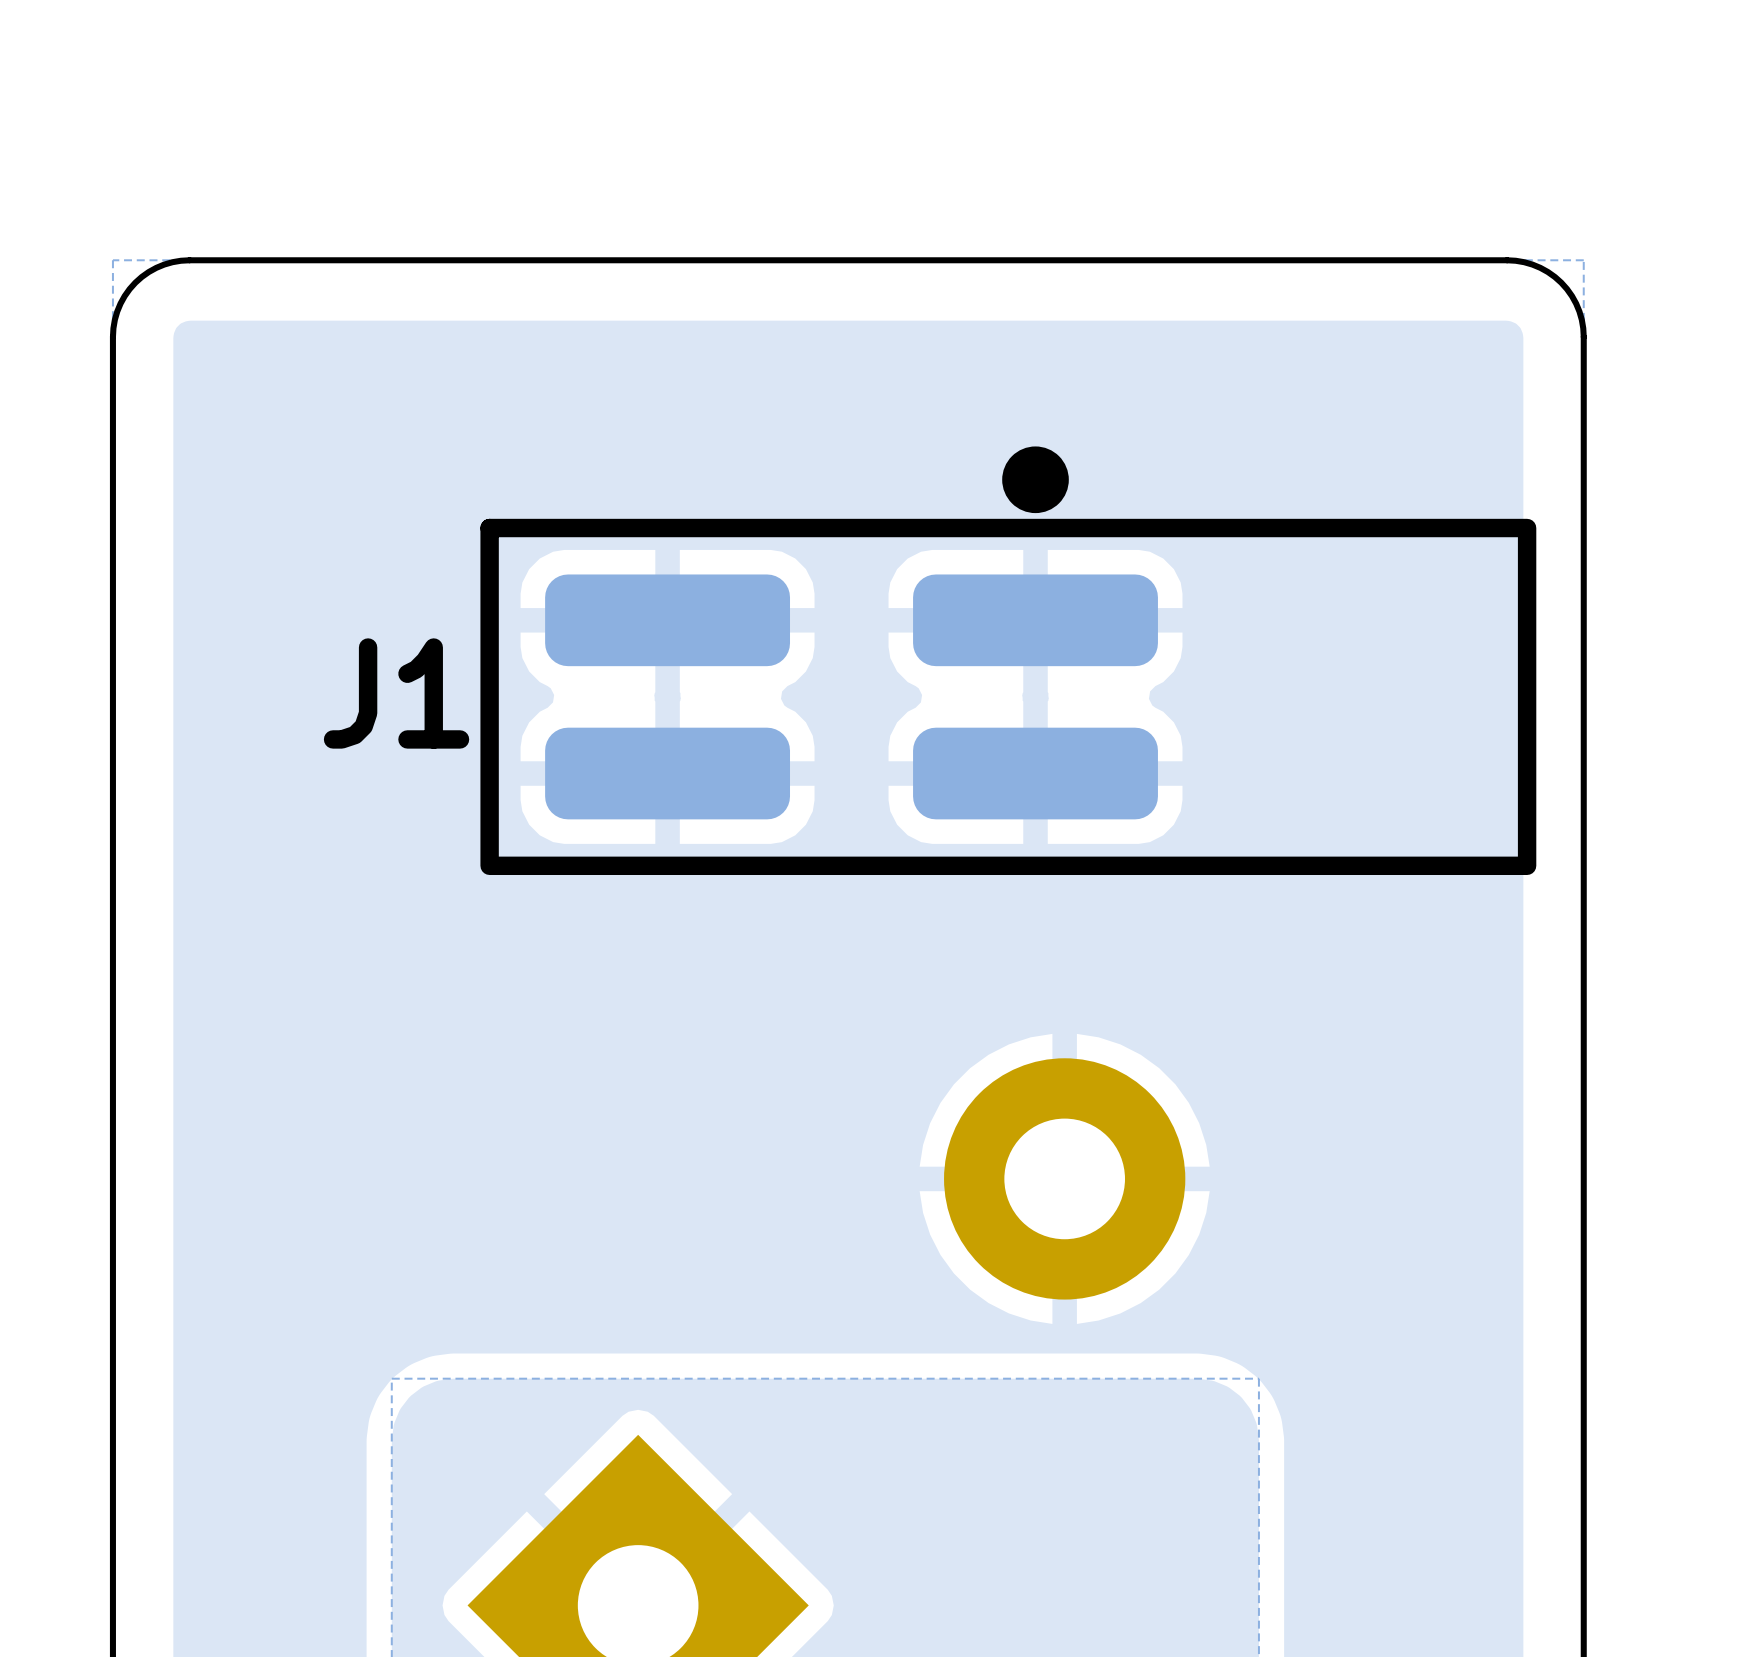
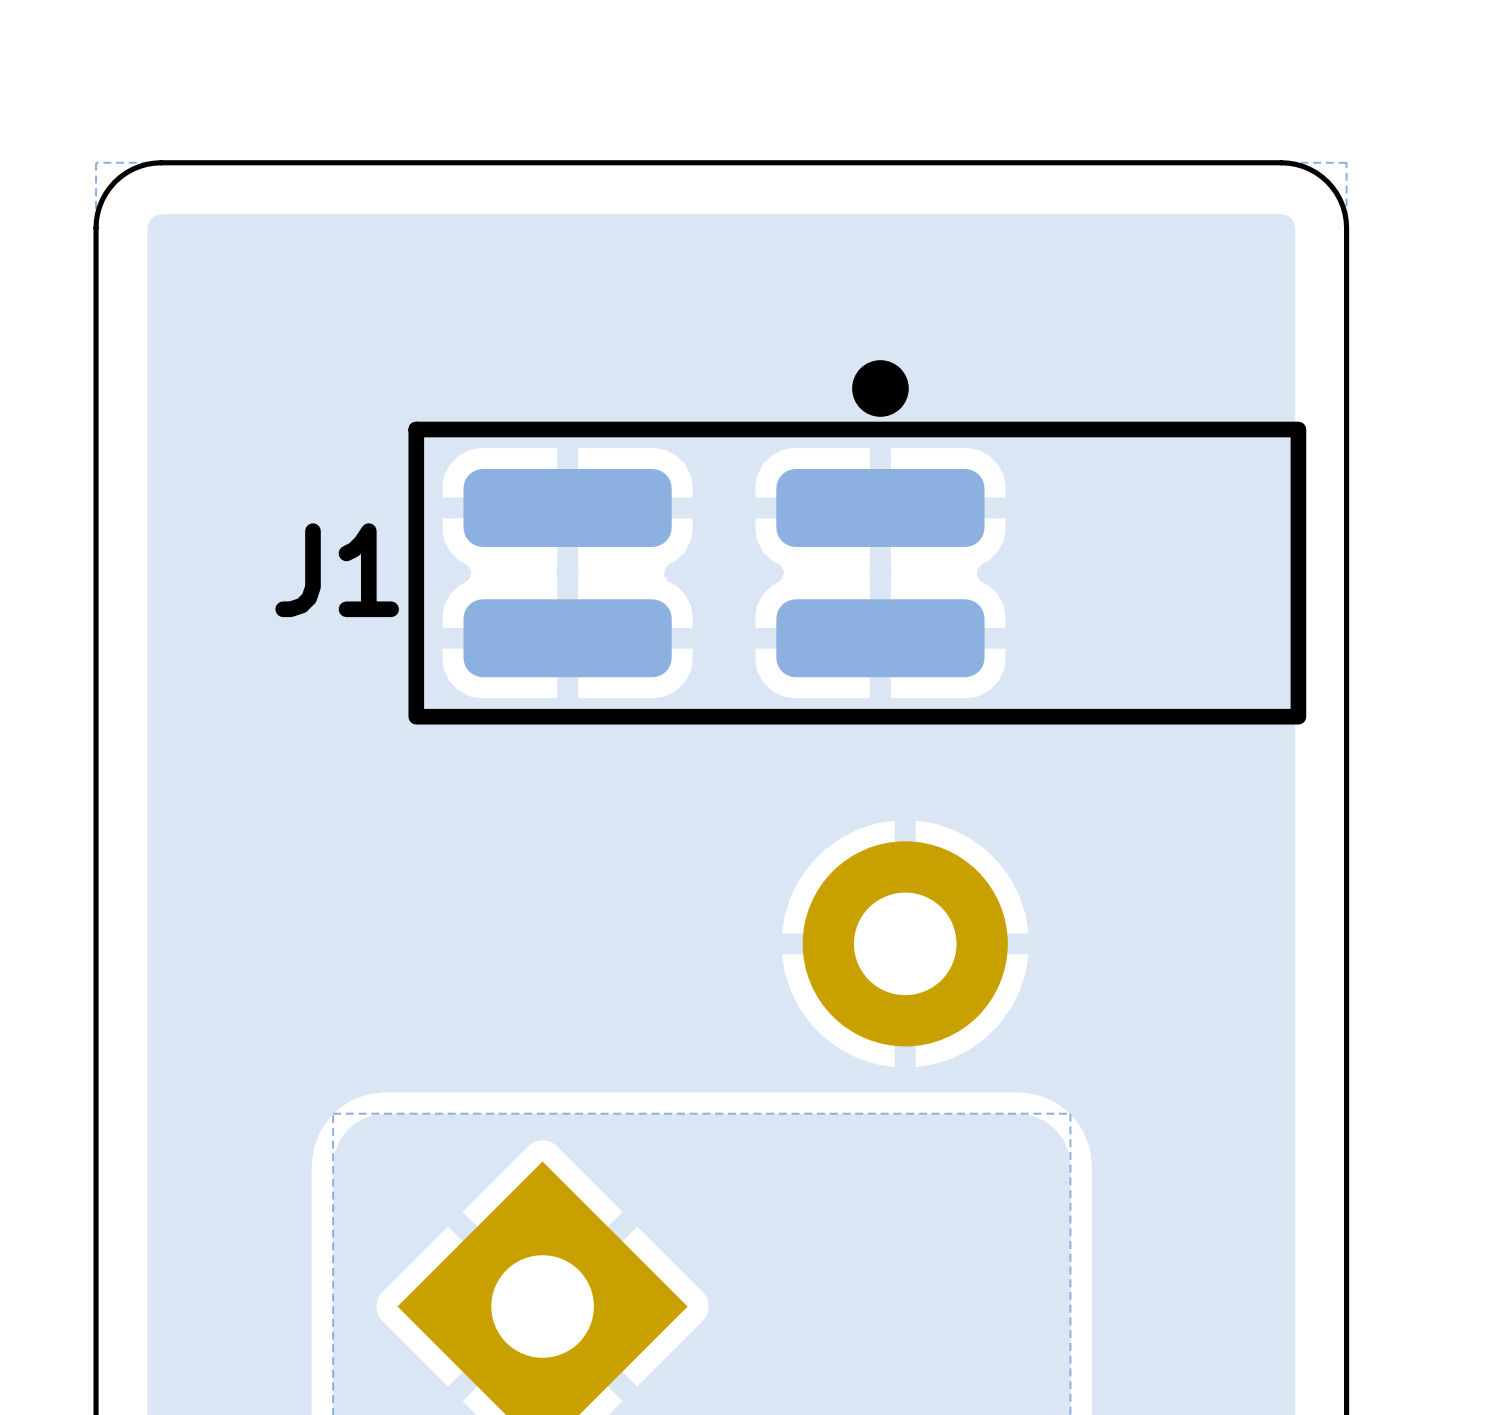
J1 position: (1008, 660) -> (857, 542)

